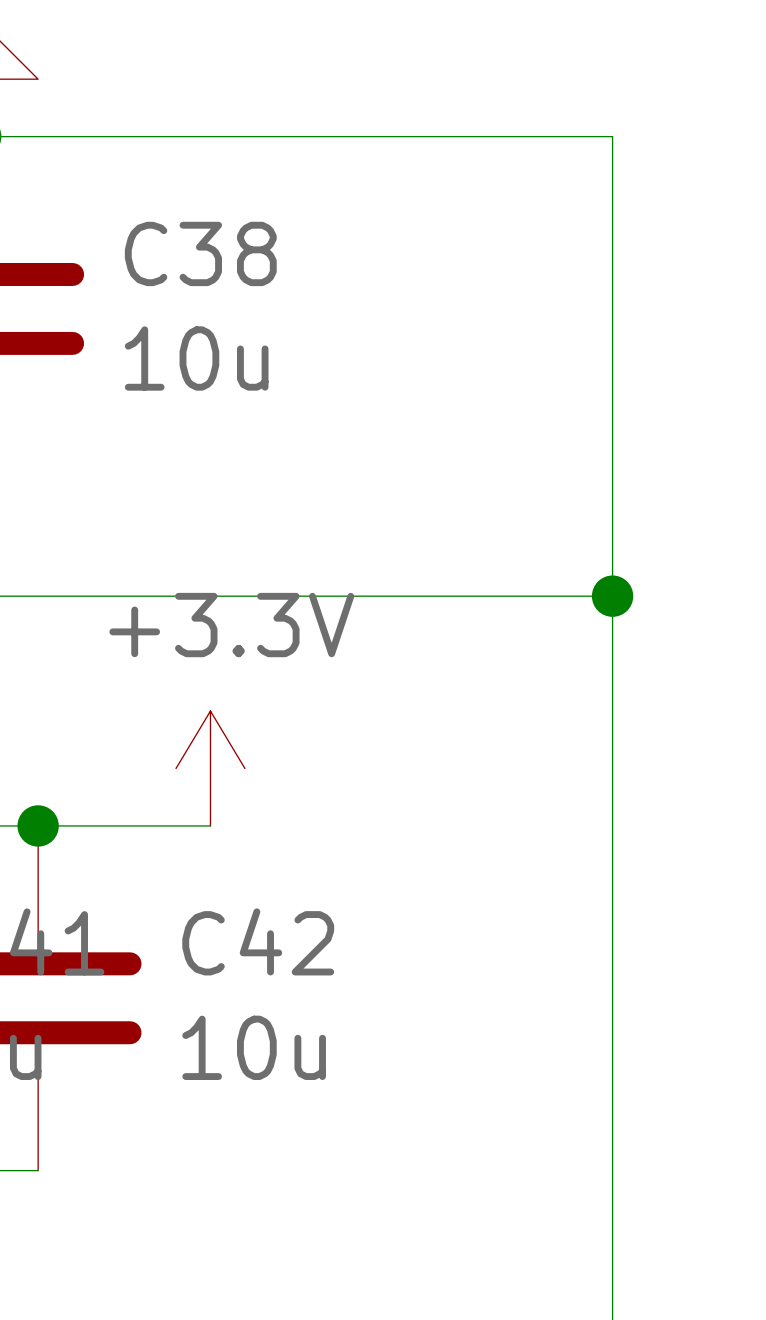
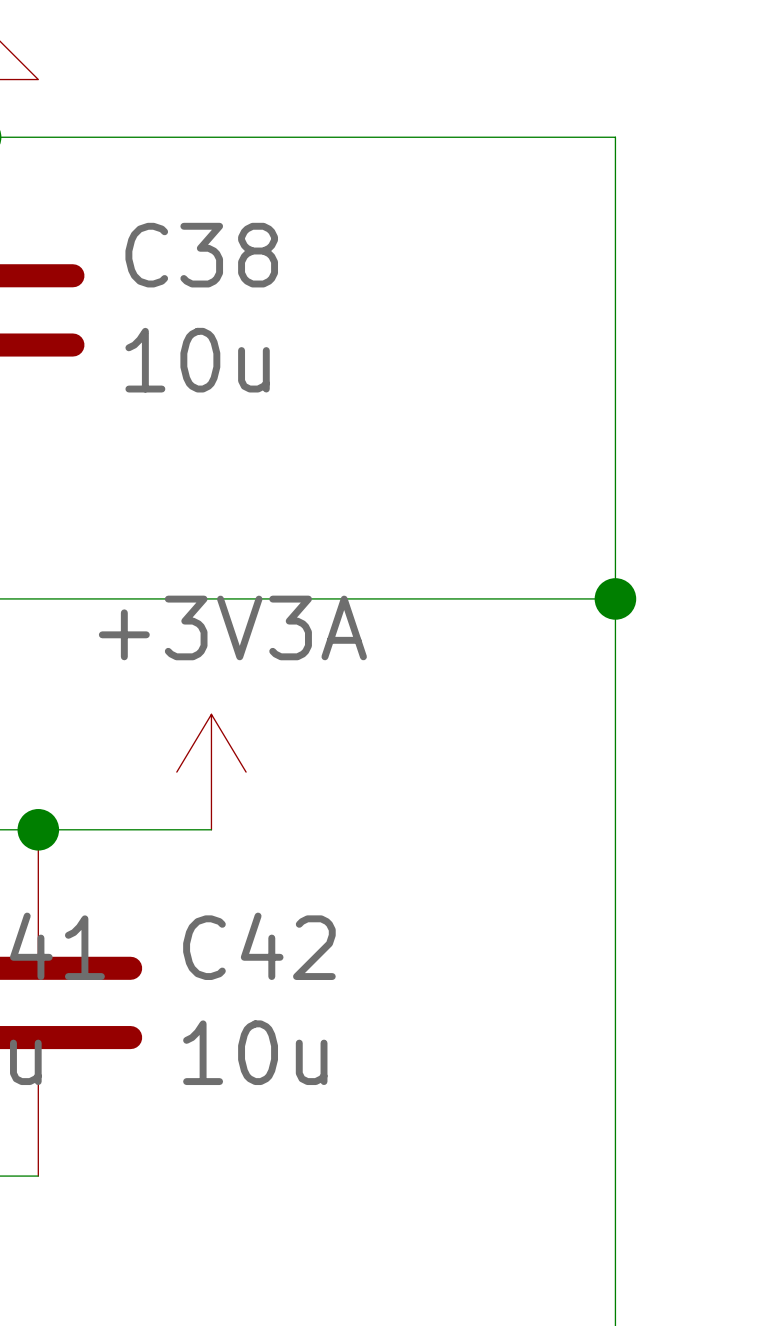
power symbol: +3.3V (210, 768) -> +3V3A (211, 772)

